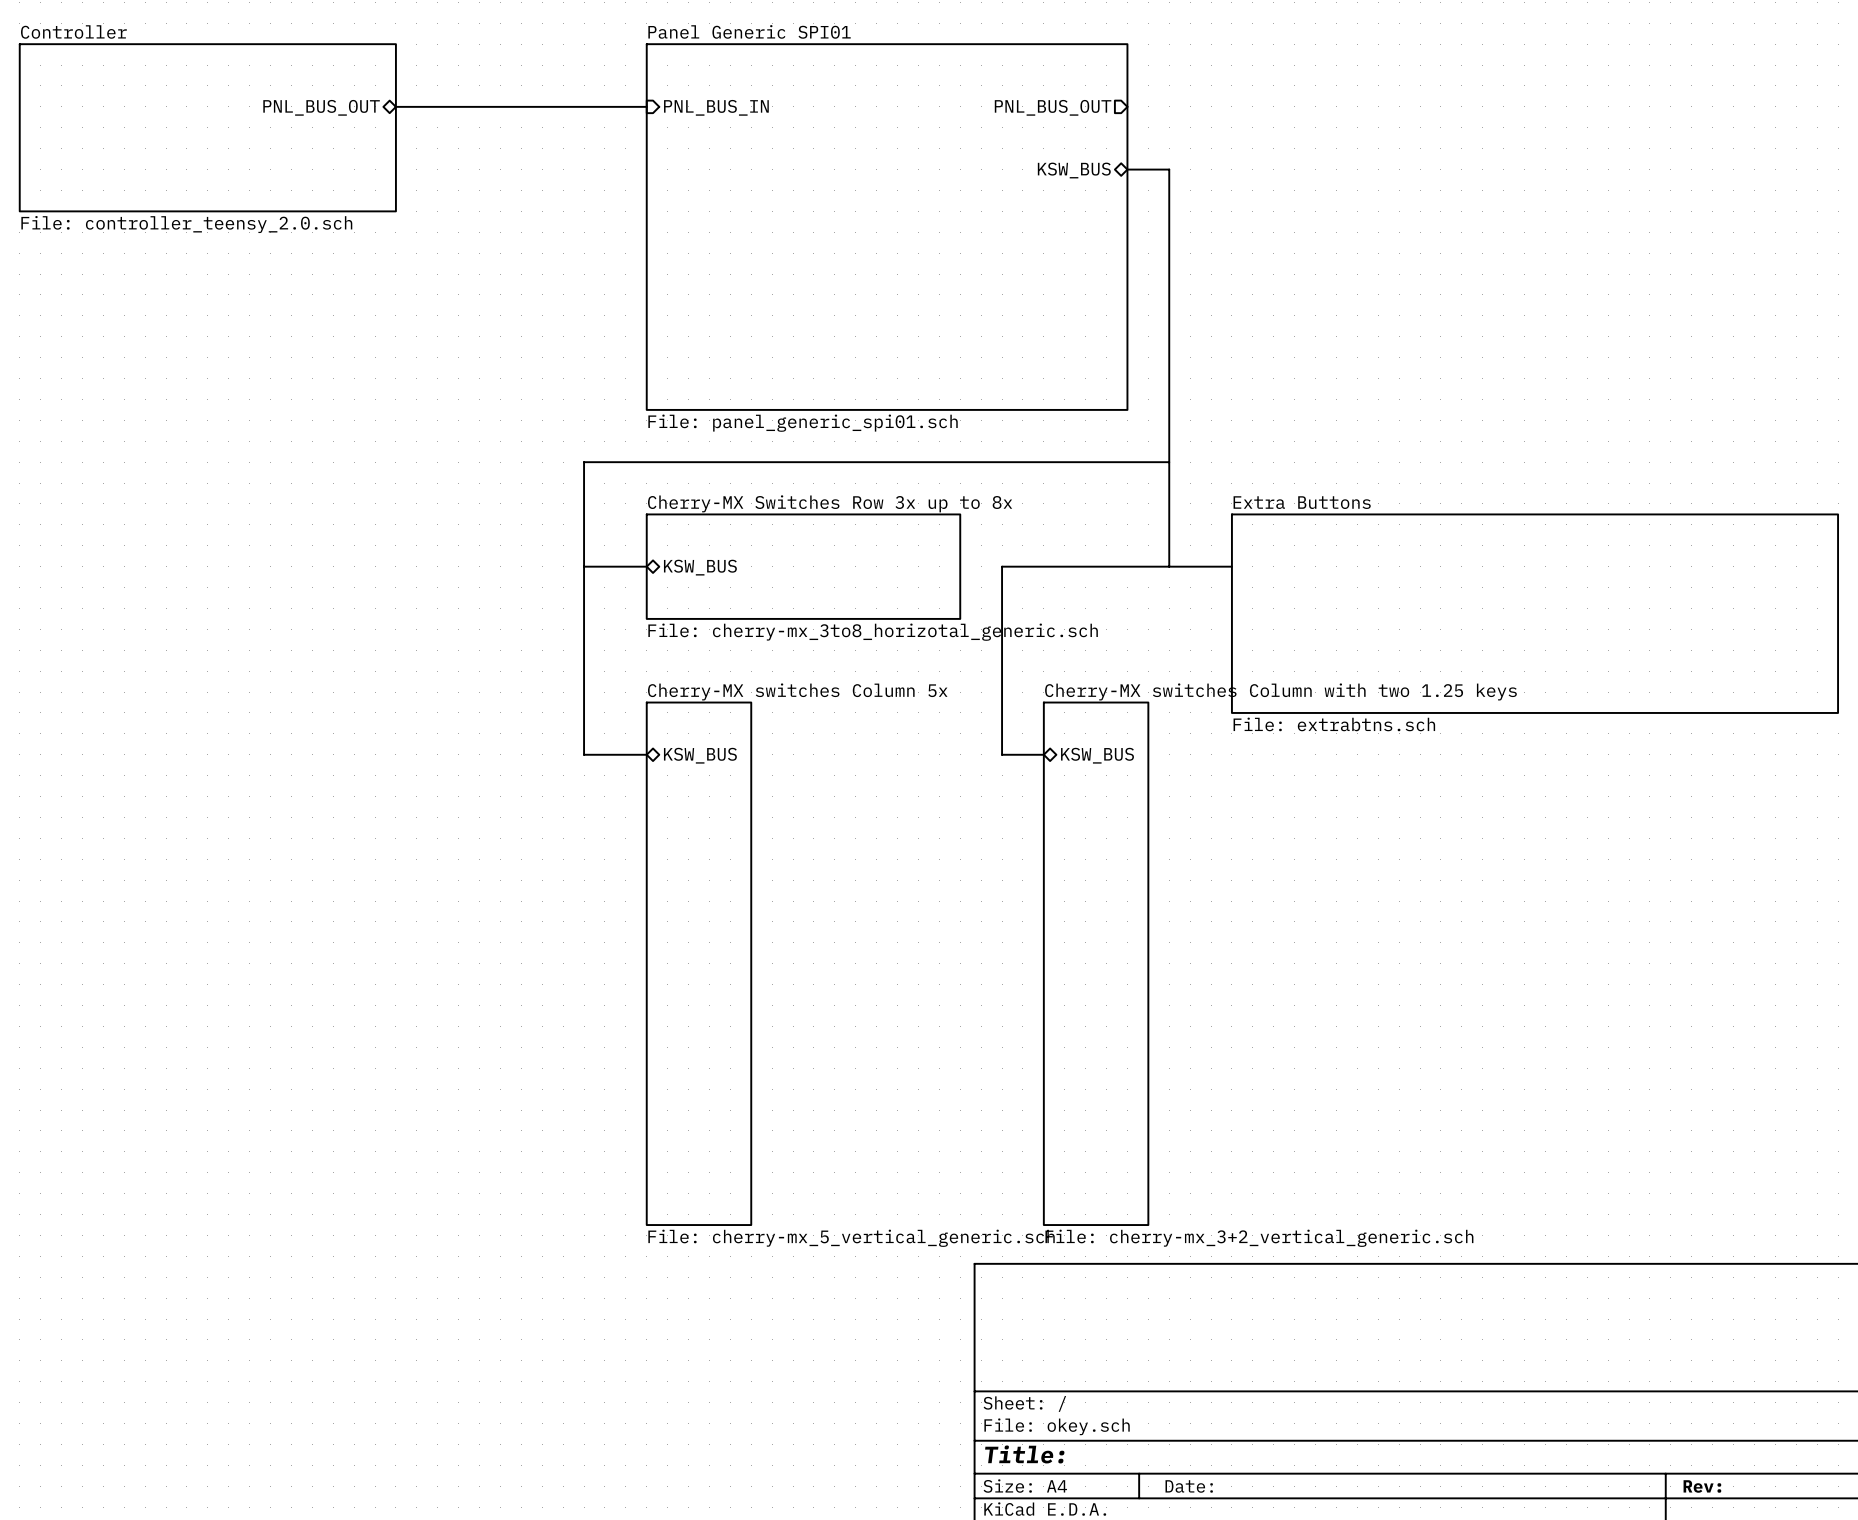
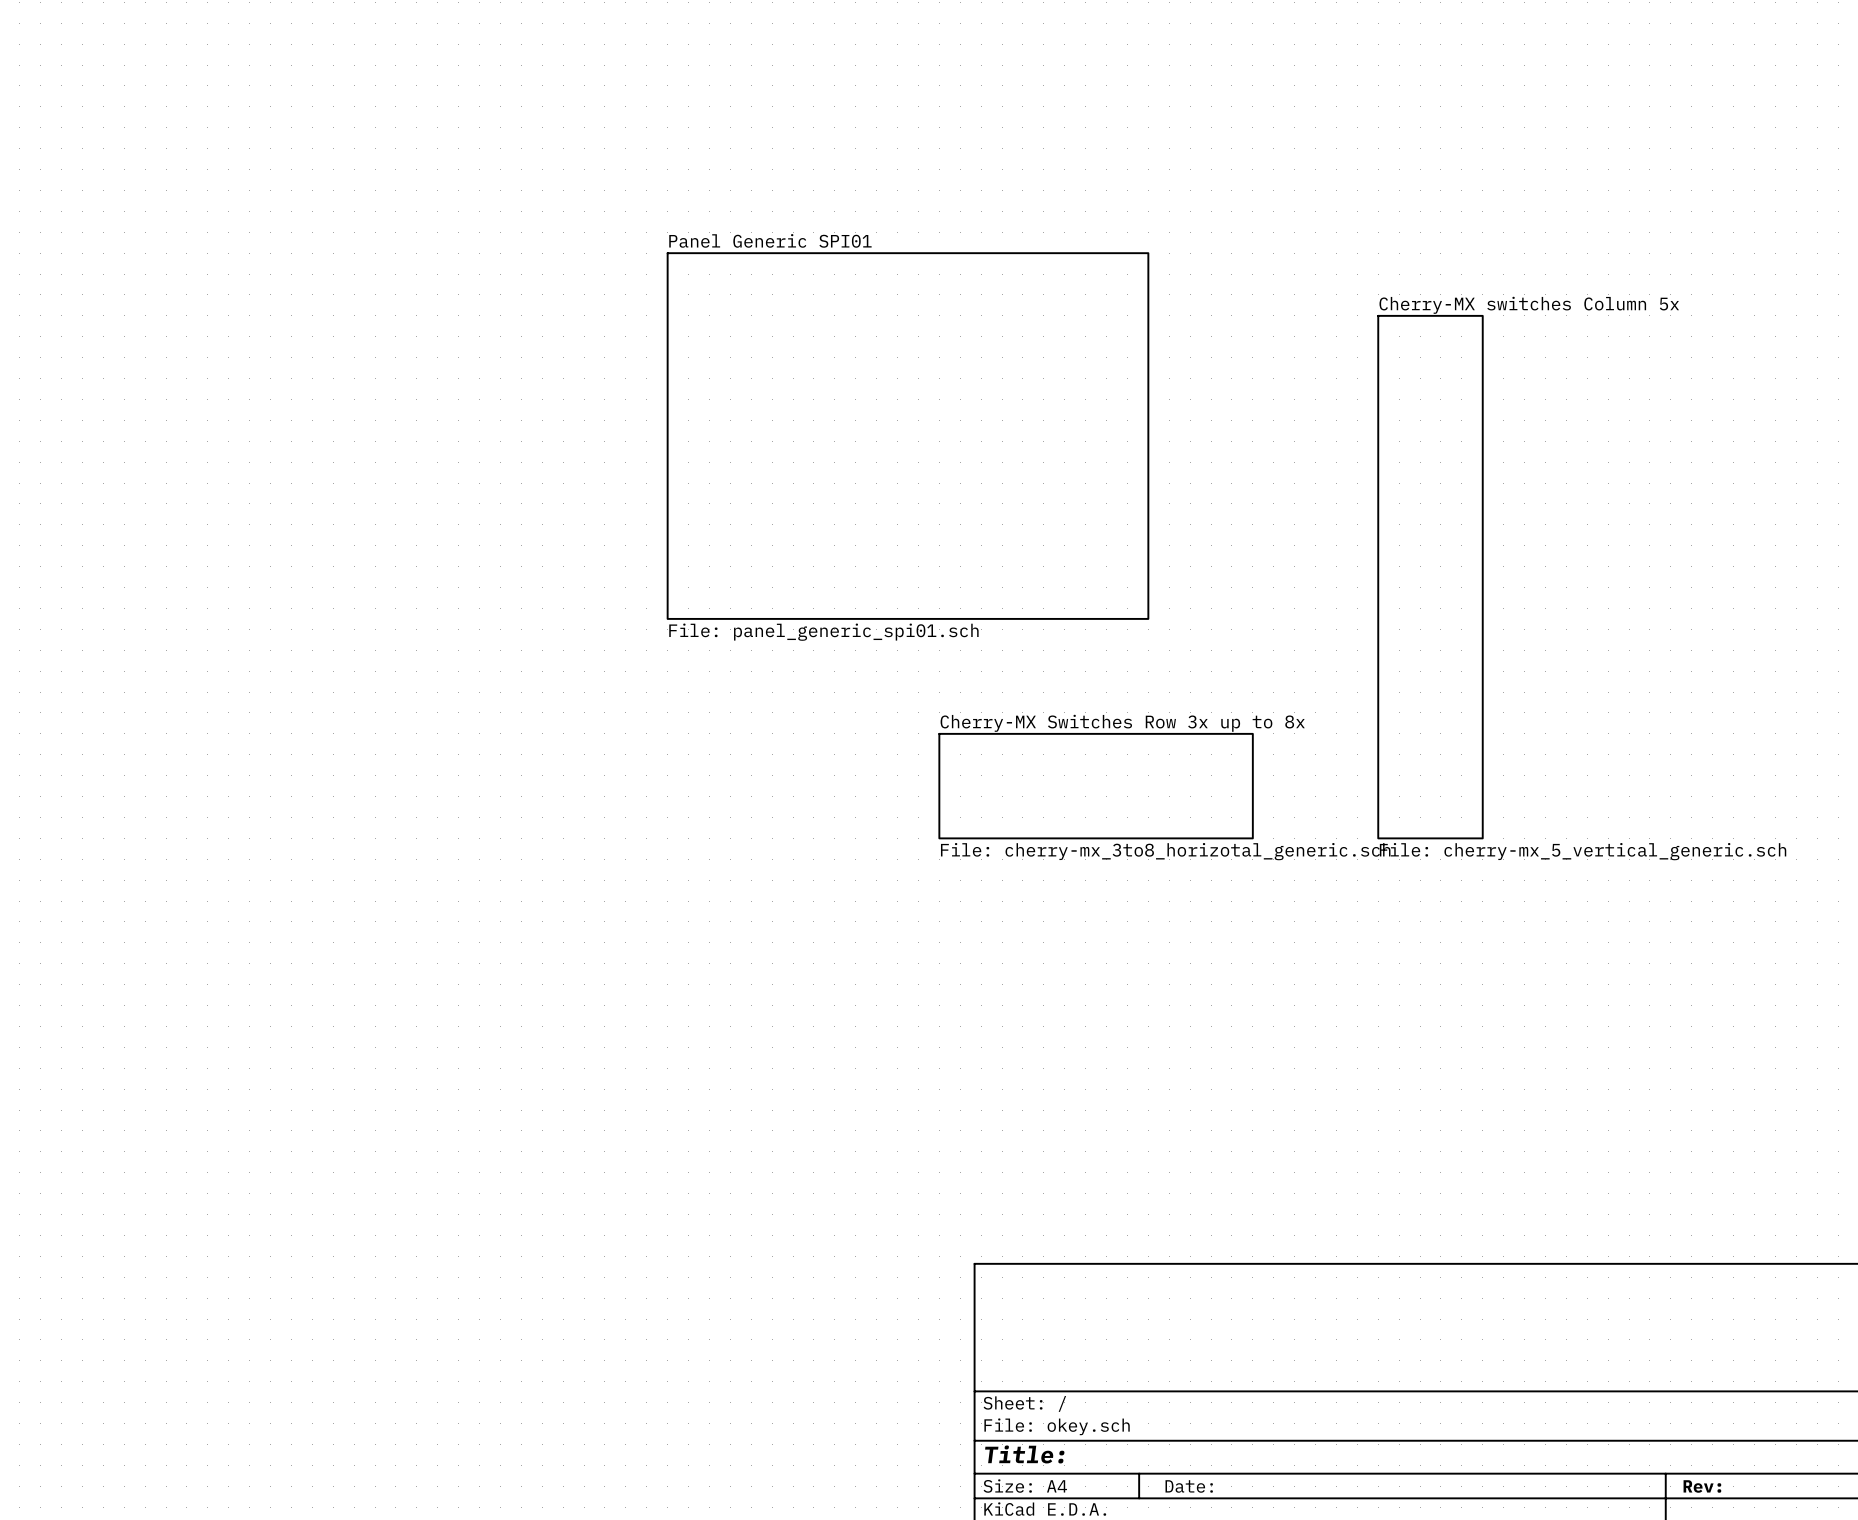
bus: (395, 106) (646, 106) -> none
sheet pin: PNL_BUS_OUT (321, 107) -> none
sheet pin: PNL_BUS_IN (716, 107) -> none
sheet pin: PNL_BUS_OUT (1053, 107) -> none
sheet Controller: File: controller_teensy_2.0.sch (207, 127) -> none
bus: (1127, 169) (1169, 169) (1169, 566) -> none
sheet pin: KSW_BUS (1074, 170) -> none
sheet Panel Generic SPI01 position: (887, 227) -> (908, 436)
bus: (1169, 462) (584, 462) (584, 754) (646, 754) -> none
bus: (584, 566) (646, 566) -> none
sheet Cherry-MX Switches Row 3x up to 8x position: (803, 566) -> (1096, 786)
bus: (1231, 566) (1002, 566) (1002, 754) (1043, 754) -> none
sheet pin: KSW_BUS (700, 567) -> none
sheet Extra Buttons: File: extrabtns.sch (1535, 613) -> none
sheet pin: KSW_BUS (700, 755) -> none
sheet pin: KSW_BUS (1097, 755) -> none
sheet Cherry-MX switches Column 5x position: (699, 963) -> (1430, 577)
sheet Cherry-MX switches Column with two 1.25 keys: File: cherry-mx_3+2_vertical_generic.sch (1096, 963) -> none

